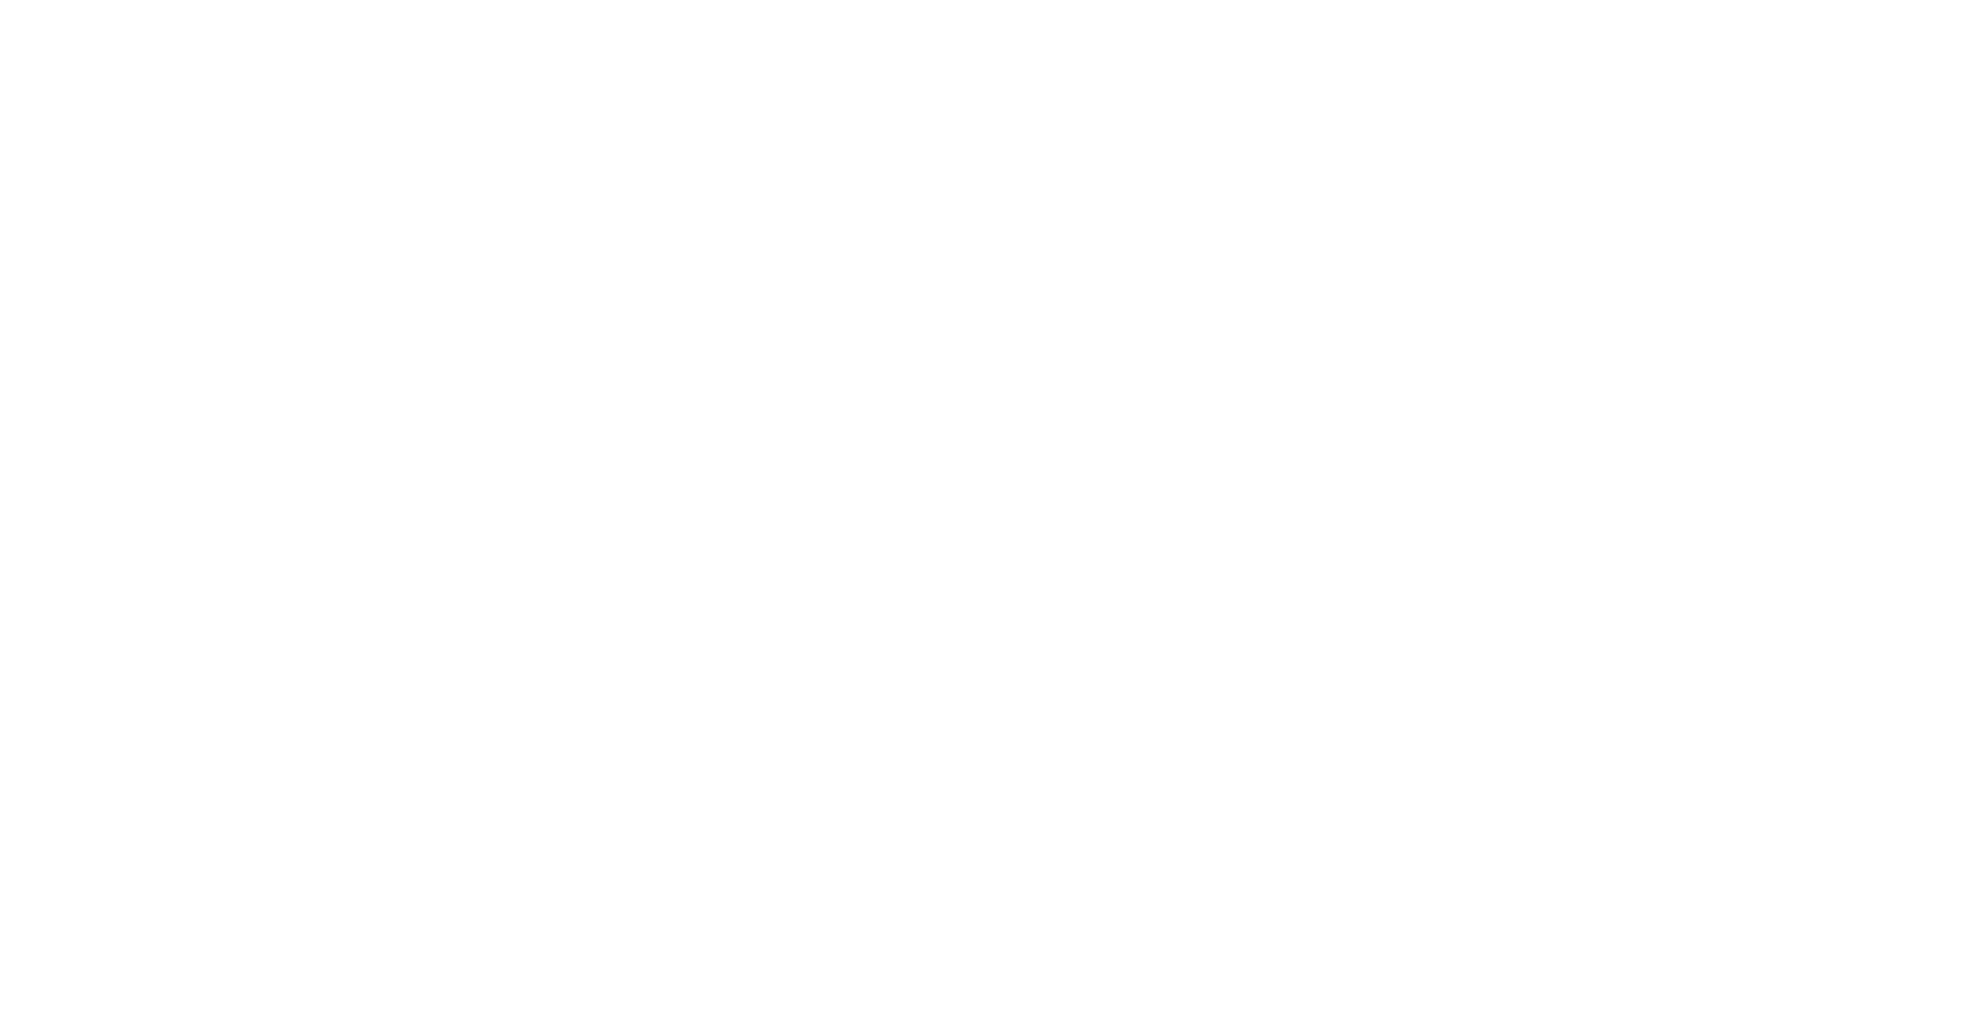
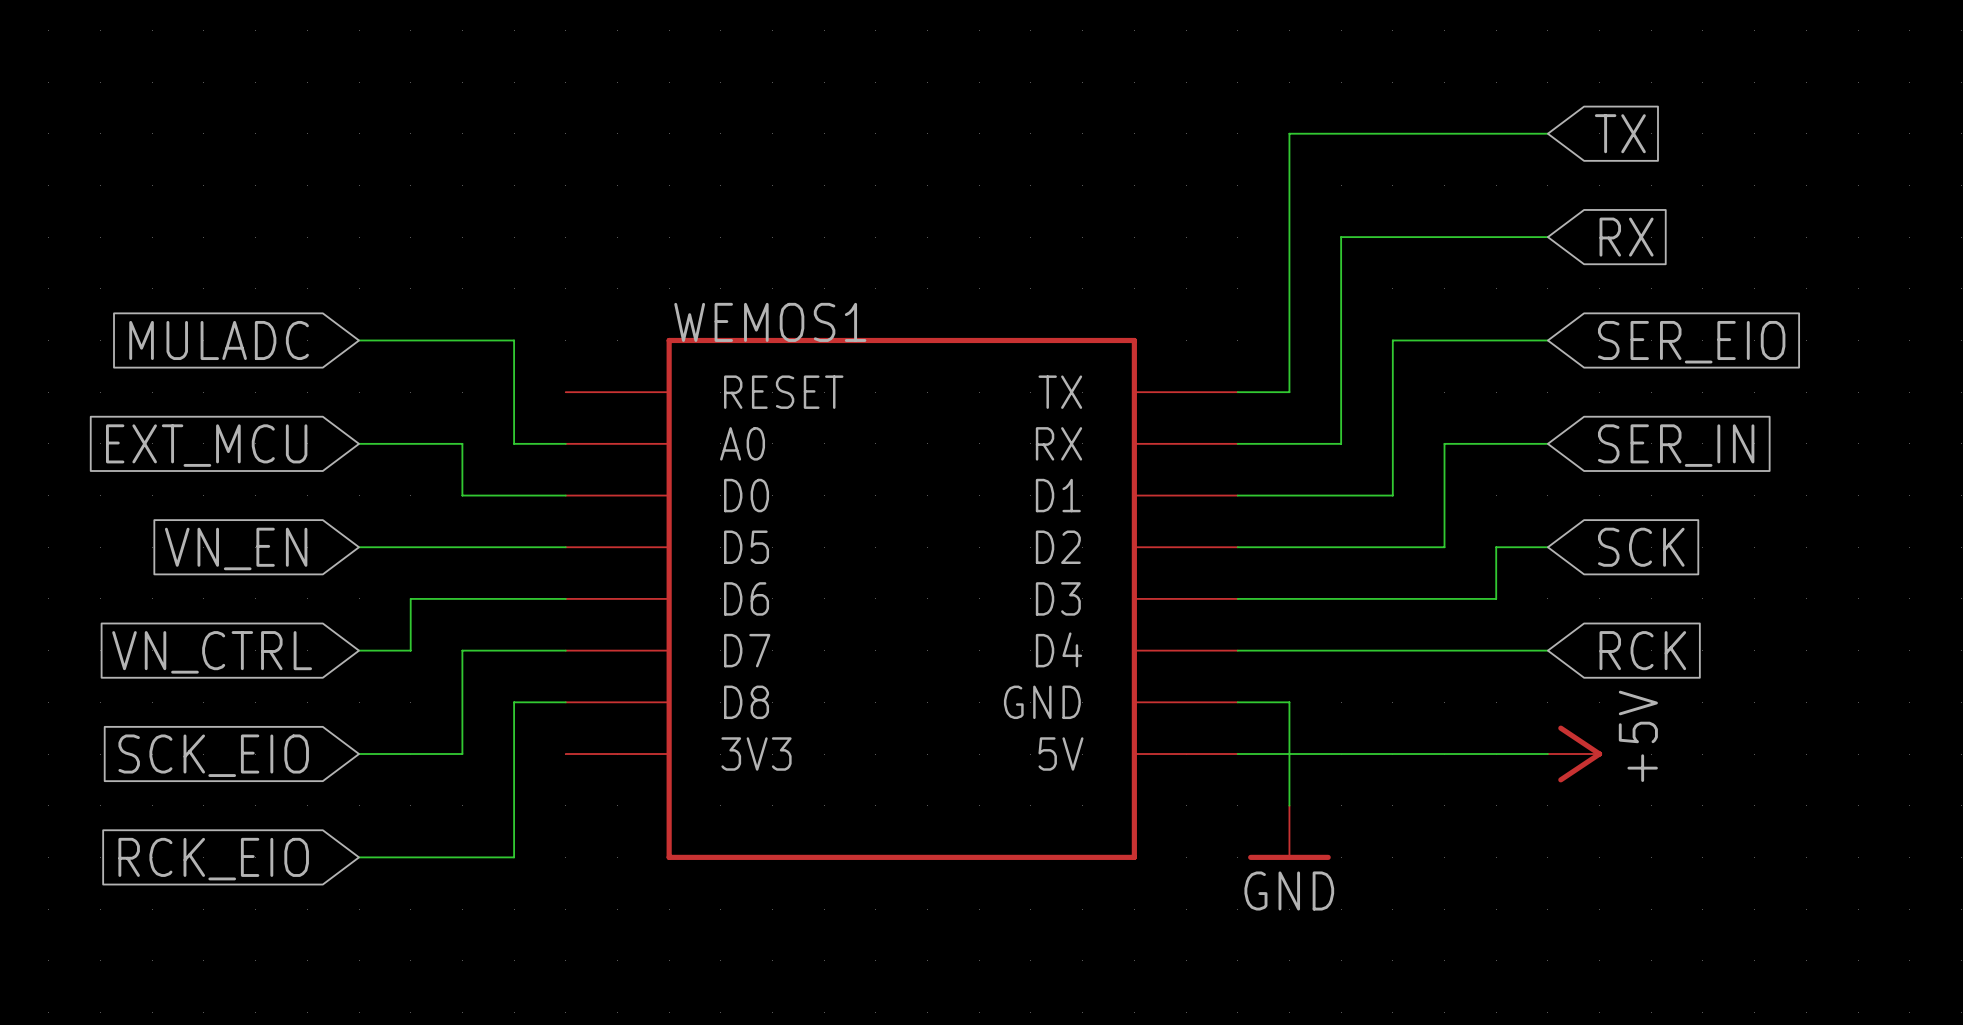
wire: none -> (1547, 133) (1289, 133) (1289, 392) (1237, 392)
global label: none -> TX (1620, 133)
wire: none -> (1547, 237) (1341, 237) (1341, 443) (1237, 443)
global label: none -> RX (1626, 237)
global label: none -> MULADC (219, 340)
wire: none -> (359, 340) (514, 340) (514, 443) (565, 443)
wire: none -> (1547, 340) (1392, 340) (1392, 495) (1237, 495)
global label: none -> SER_EIO (1691, 342)
wire: none -> (359, 443) (462, 443) (462, 495) (565, 495)
wire: none -> (1547, 443) (1444, 443) (1444, 547) (1237, 547)
global label: none -> EXT_MCU (206, 445)
global label: none -> SER_IN (1676, 445)
wire: none -> (359, 547) (565, 547)
wire: none -> (1547, 547) (1496, 547) (1496, 598) (1237, 598)
global label: none -> SCK (1641, 547)
global label: none -> VN_EN (236, 548)
wire: none -> (565, 598) (410, 598) (410, 650) (359, 650)
WEMOS1: none -> (901, 598)
wire: none -> (565, 650) (462, 650) (462, 754) (359, 754)
wire: none -> (1237, 650) (1547, 650)
global label: none -> RCK (1642, 650)
global label: none -> VN_CTRL (212, 652)
wire: none -> (565, 702) (514, 702) (514, 857) (359, 857)
wire: none -> (1237, 702) (1289, 702) (1289, 805)
wire: none -> (1237, 754) (1547, 754)
power symbol: none -> +5V (1575, 754)
global label: none -> SCK_EIO (213, 755)
power symbol: none -> GND (1289, 832)
global label: none -> RCK_EIO (213, 859)

